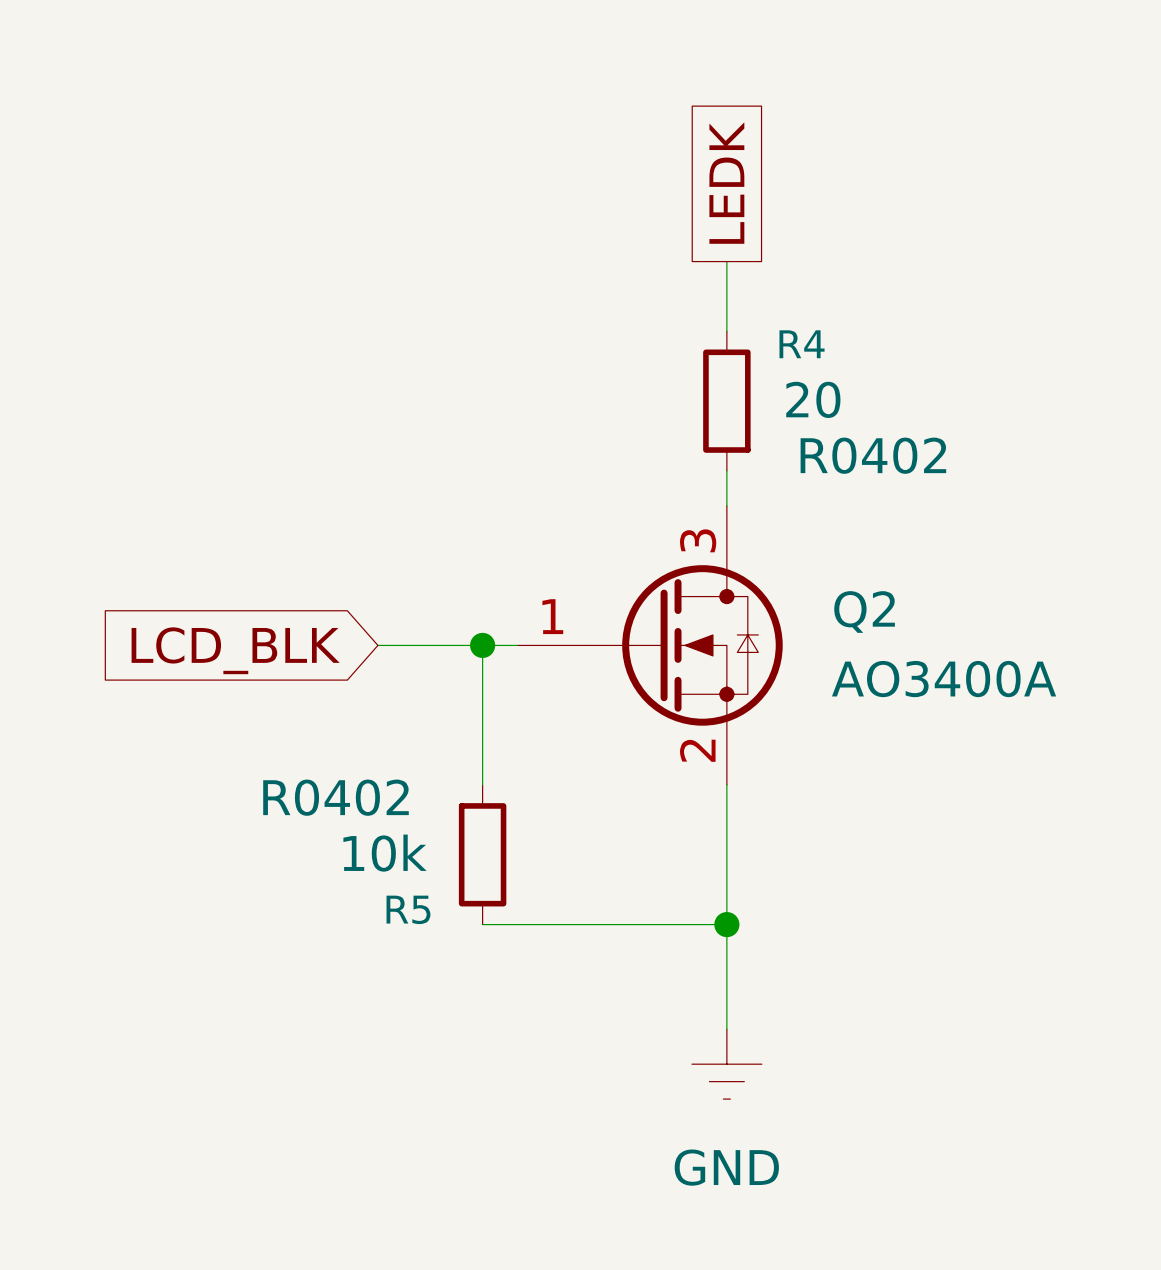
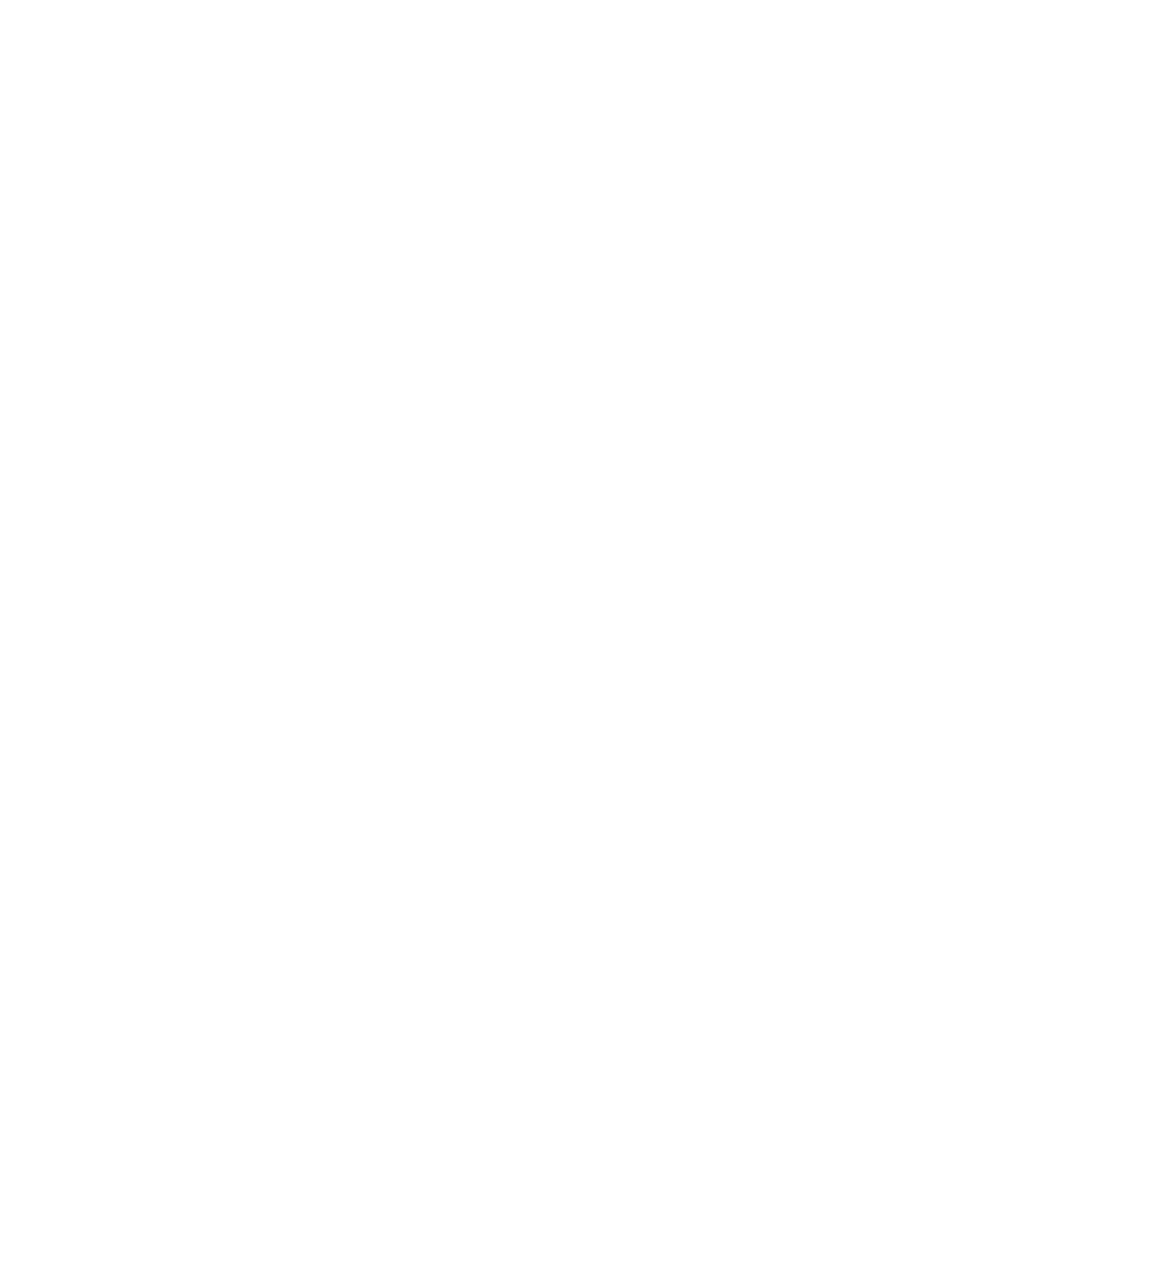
global label: LEDK (726, 183) -> none
wire: (726, 261) (726, 331) -> none
R4: 20 (726, 401) -> none
wire: (726, 470) (726, 505) -> none
wire: (377, 645) (517, 645) -> none
wire: (482, 645) (482, 785) -> none
junction: (482, 645) -> none
Q2: AO3400A (650, 645) -> none
global label: LCD_BLK (235, 650) -> none
wire: (726, 785) (726, 1029) -> none
R5: 10k (482, 854) -> none
wire: (482, 924) (726, 924) -> none
junction: (726, 924) -> none
power symbol: GND (726, 1064) -> none

